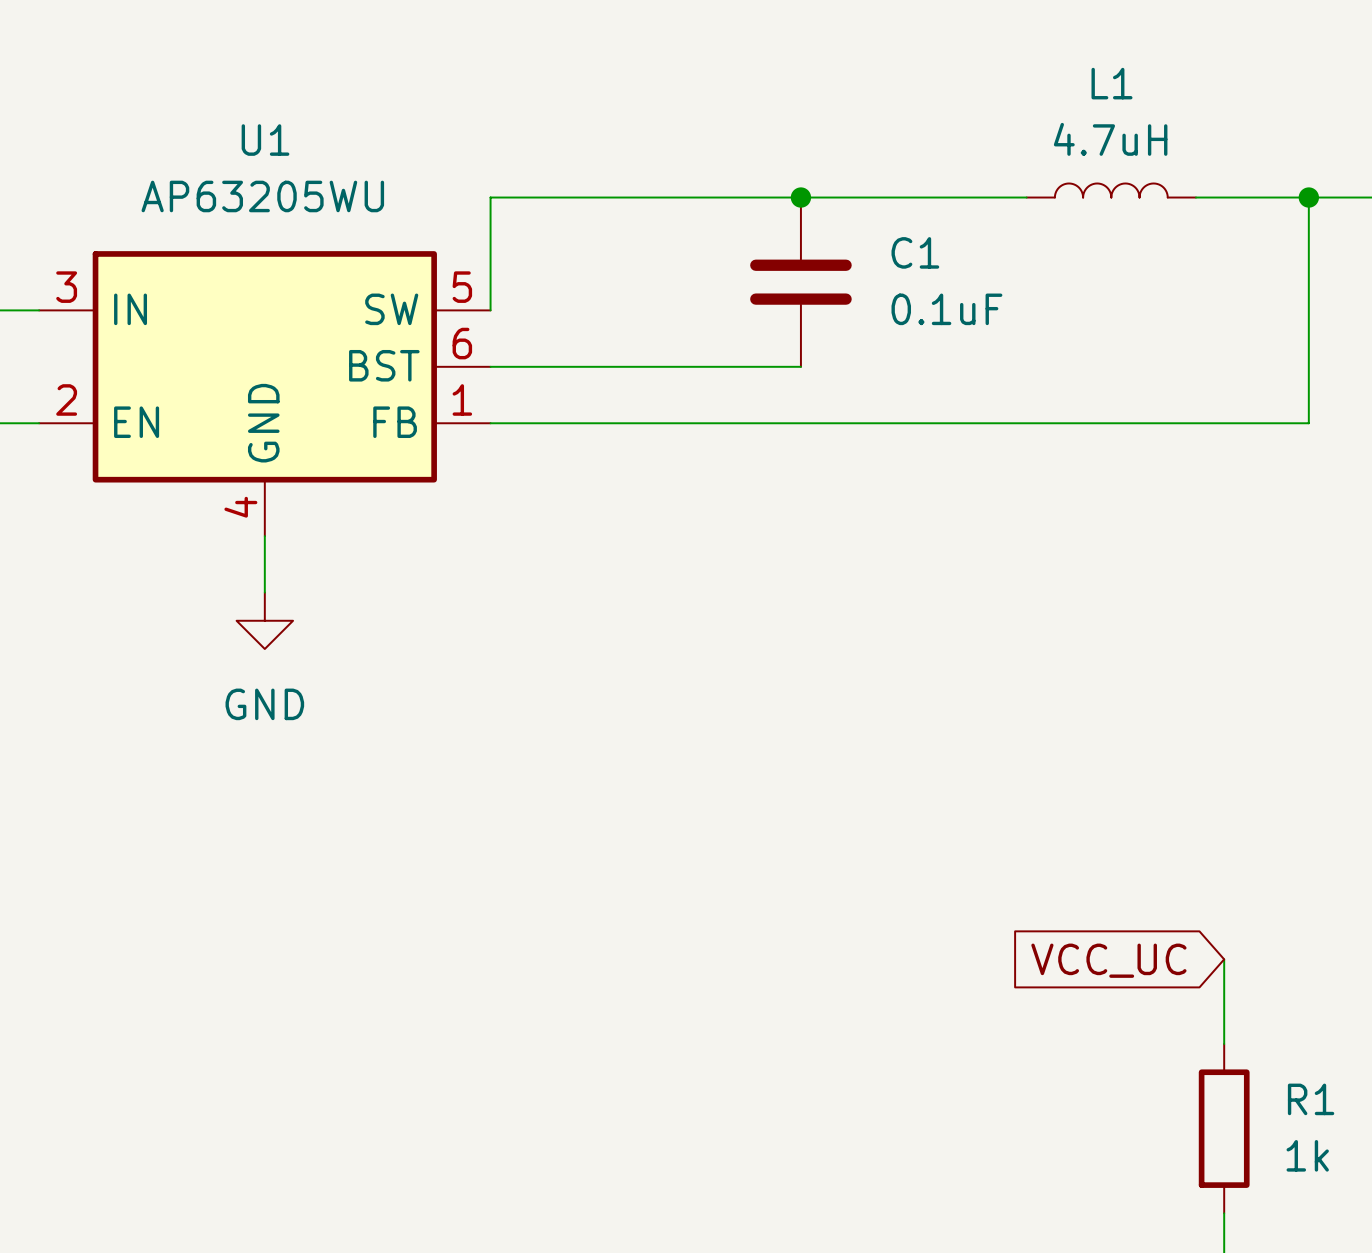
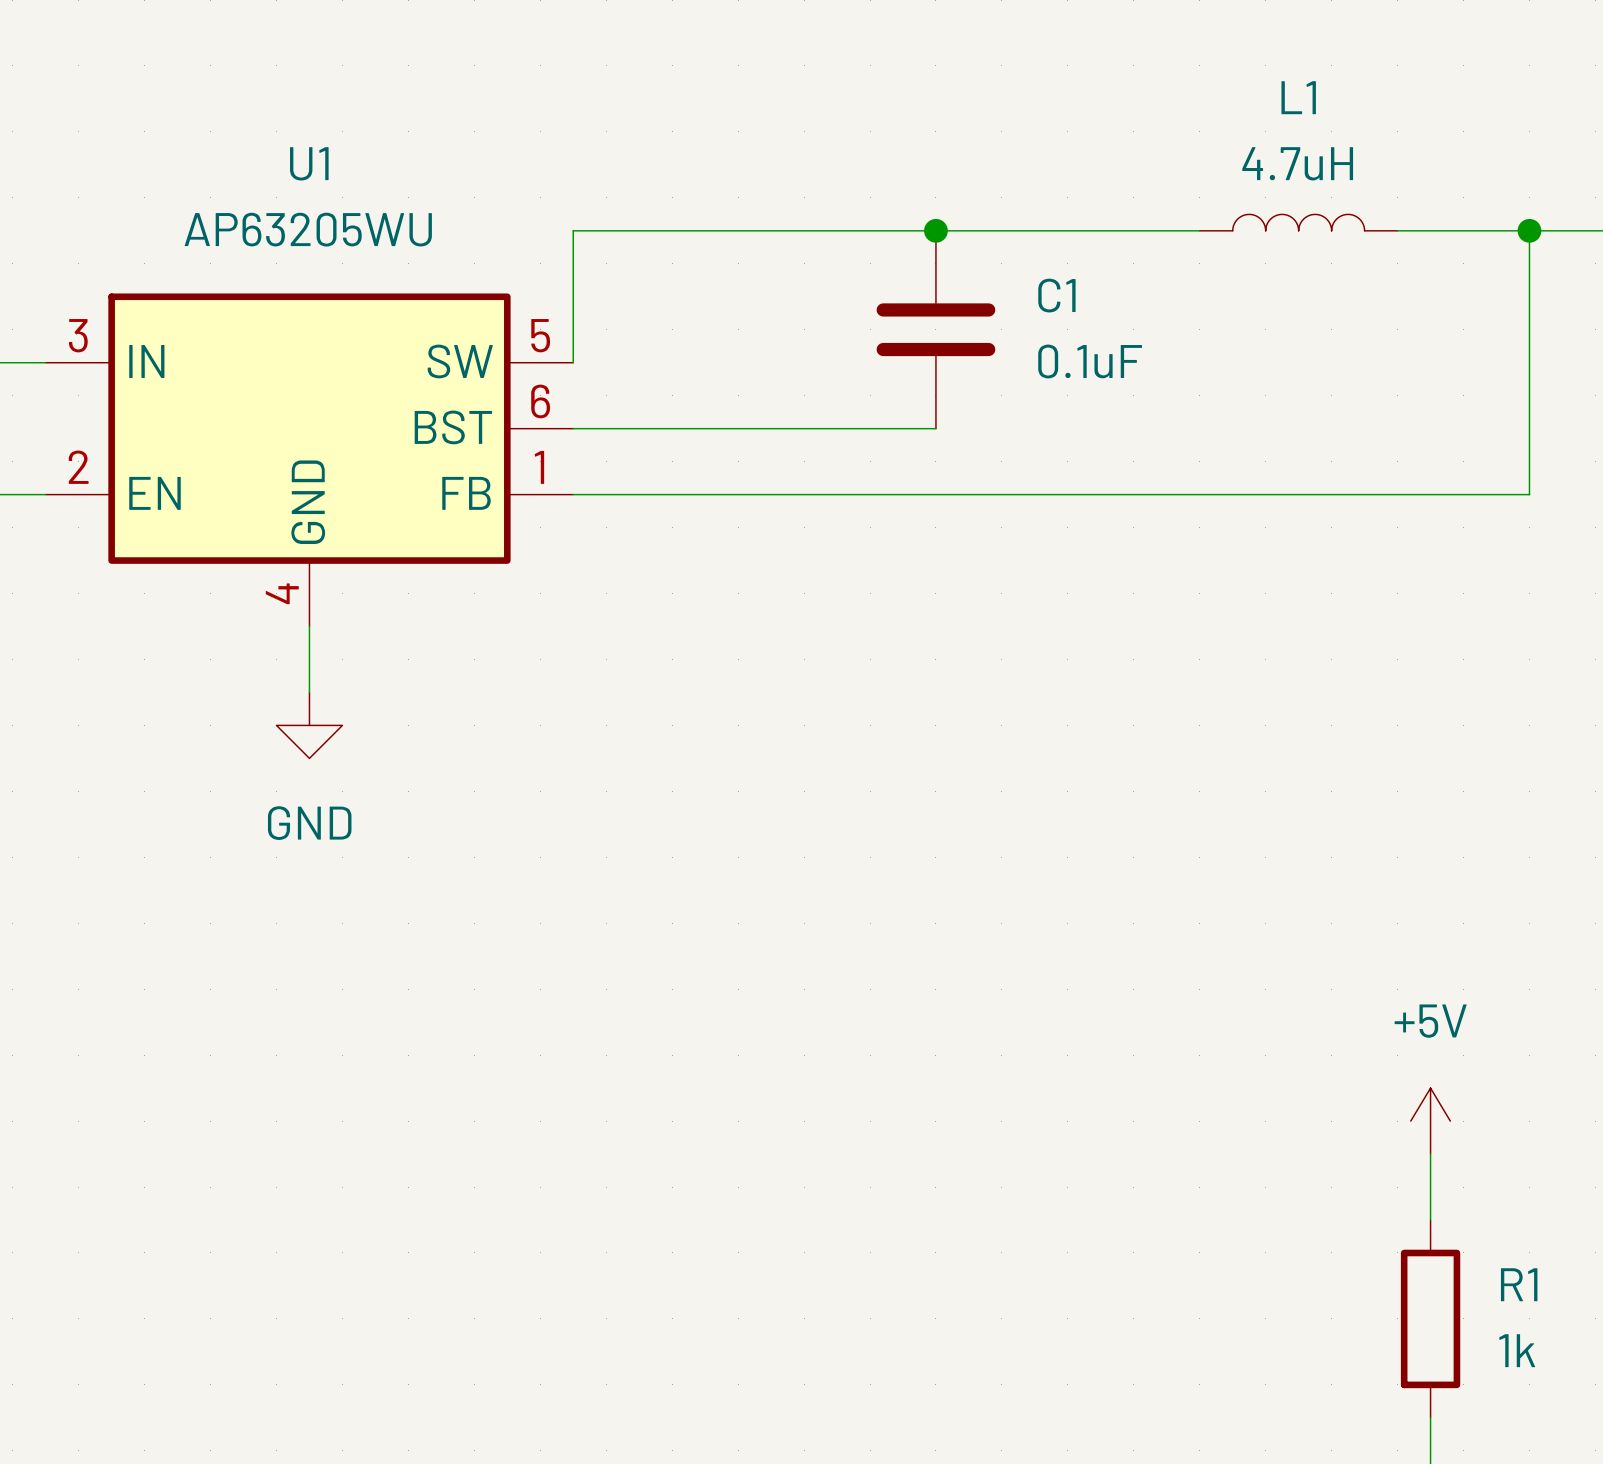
power symbol: none -> +5V (1430, 1121)
global label: VCC_UC (1108, 960) -> none

